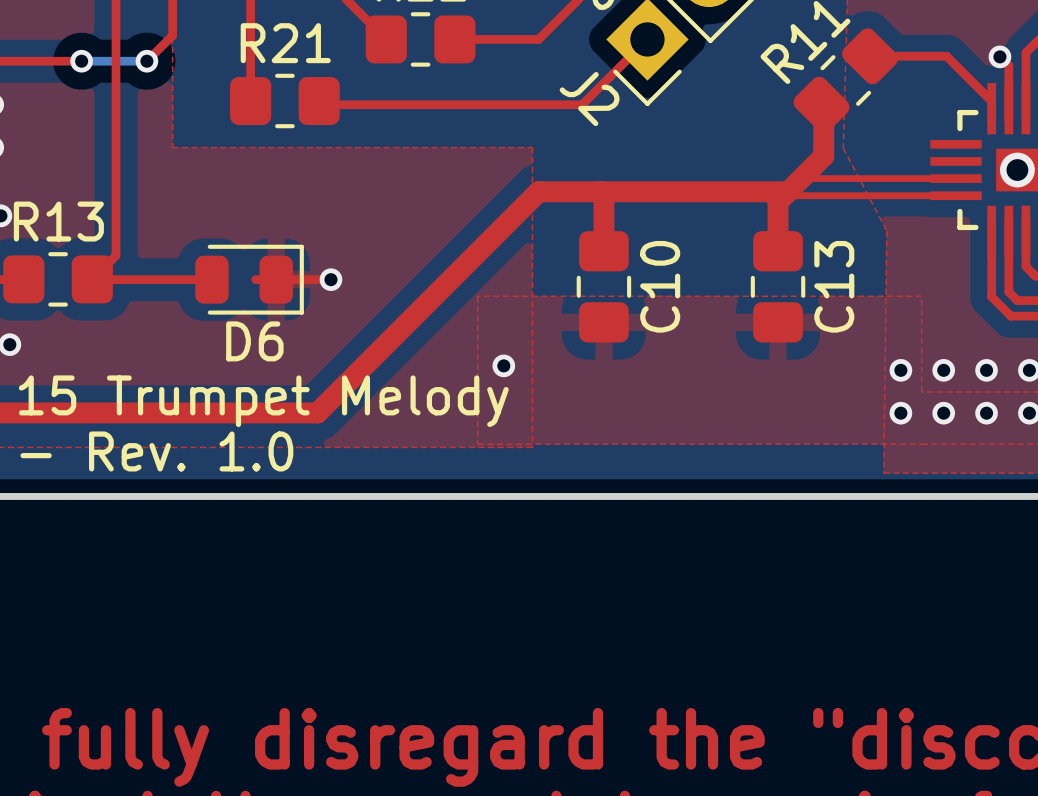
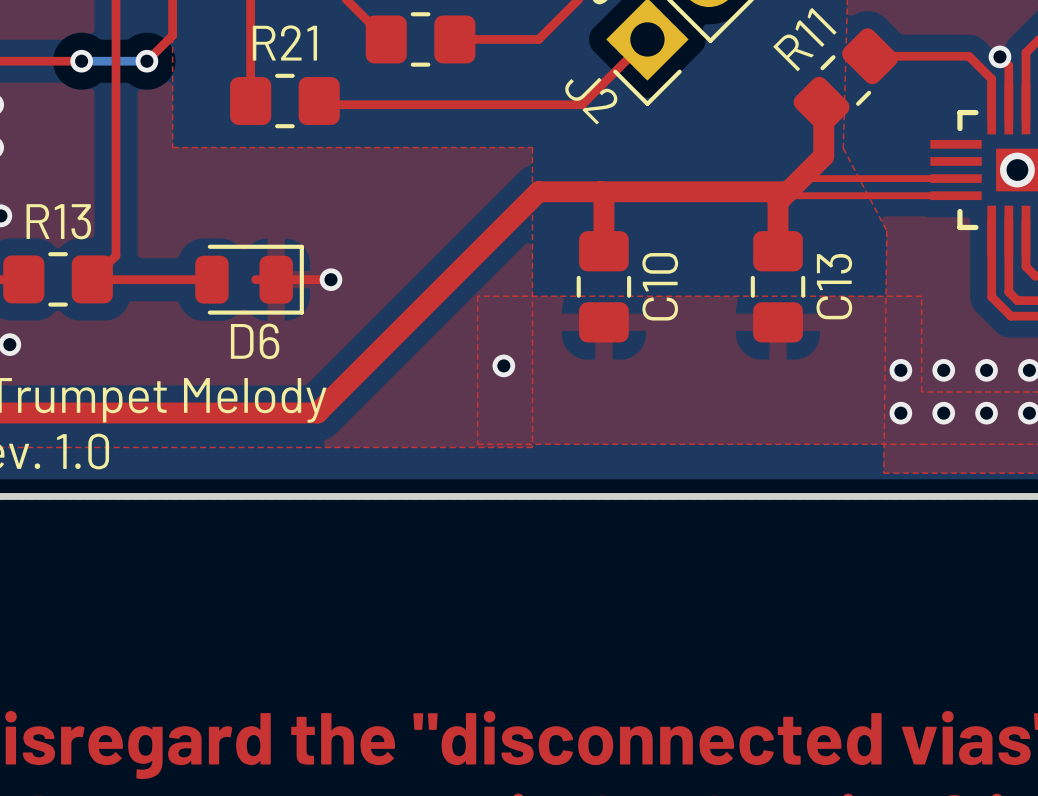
top track: (946, 56) (991, 101) -> (946, 56) (968, 56) (991, 79) (991, 101)

